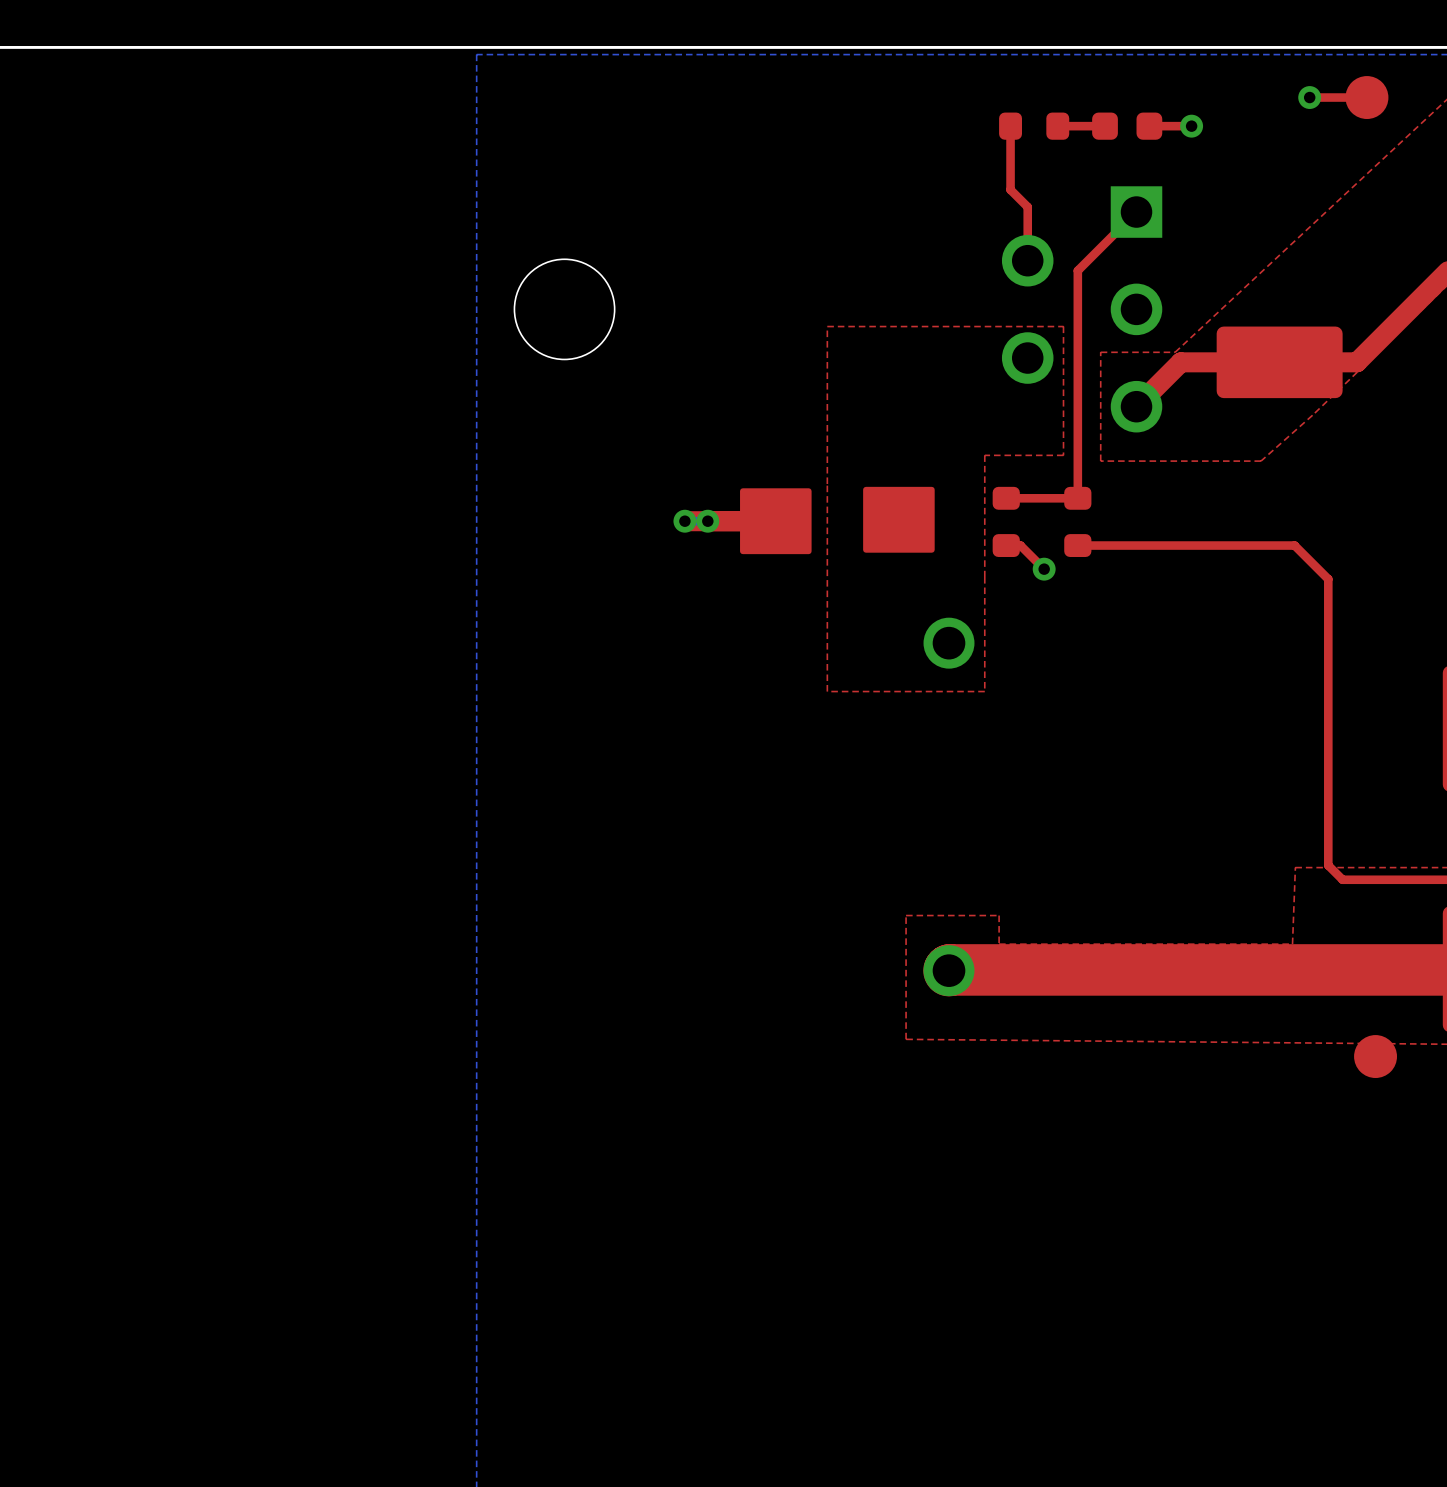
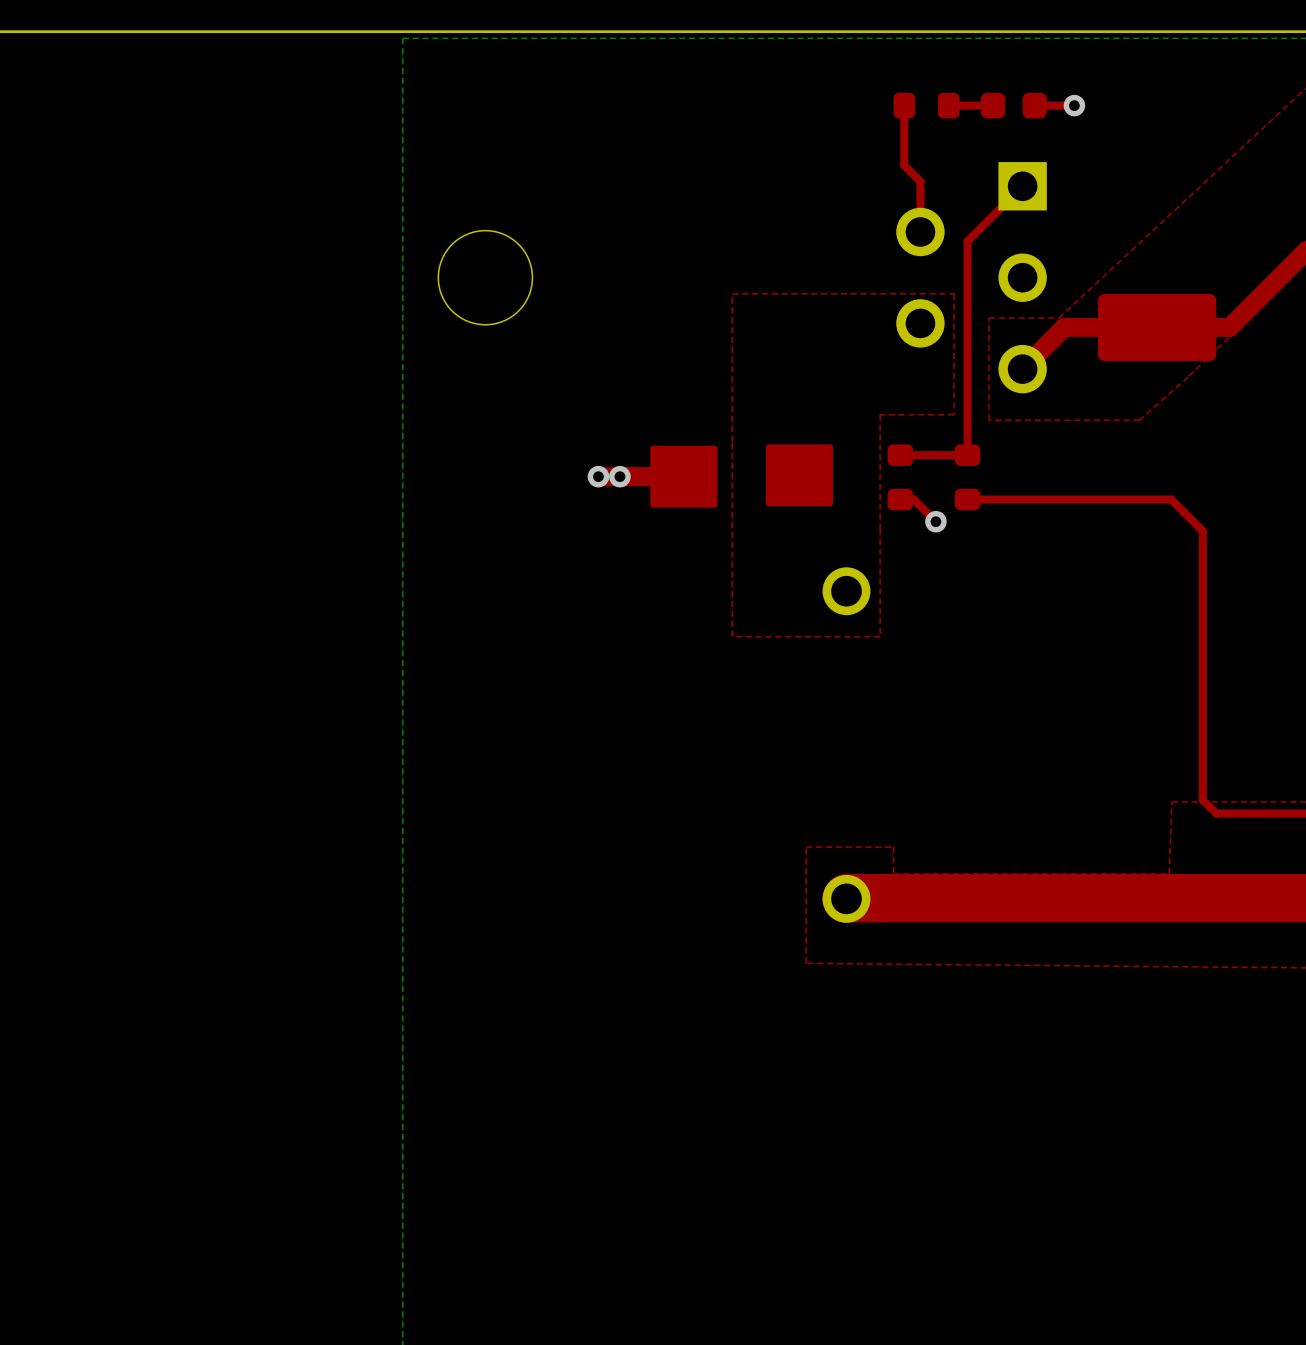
via: (1309, 97) -> none
top track: (1366, 97) (1309, 97) -> none
part: (1366, 97) -> none
part: (1375, 1056) -> none

